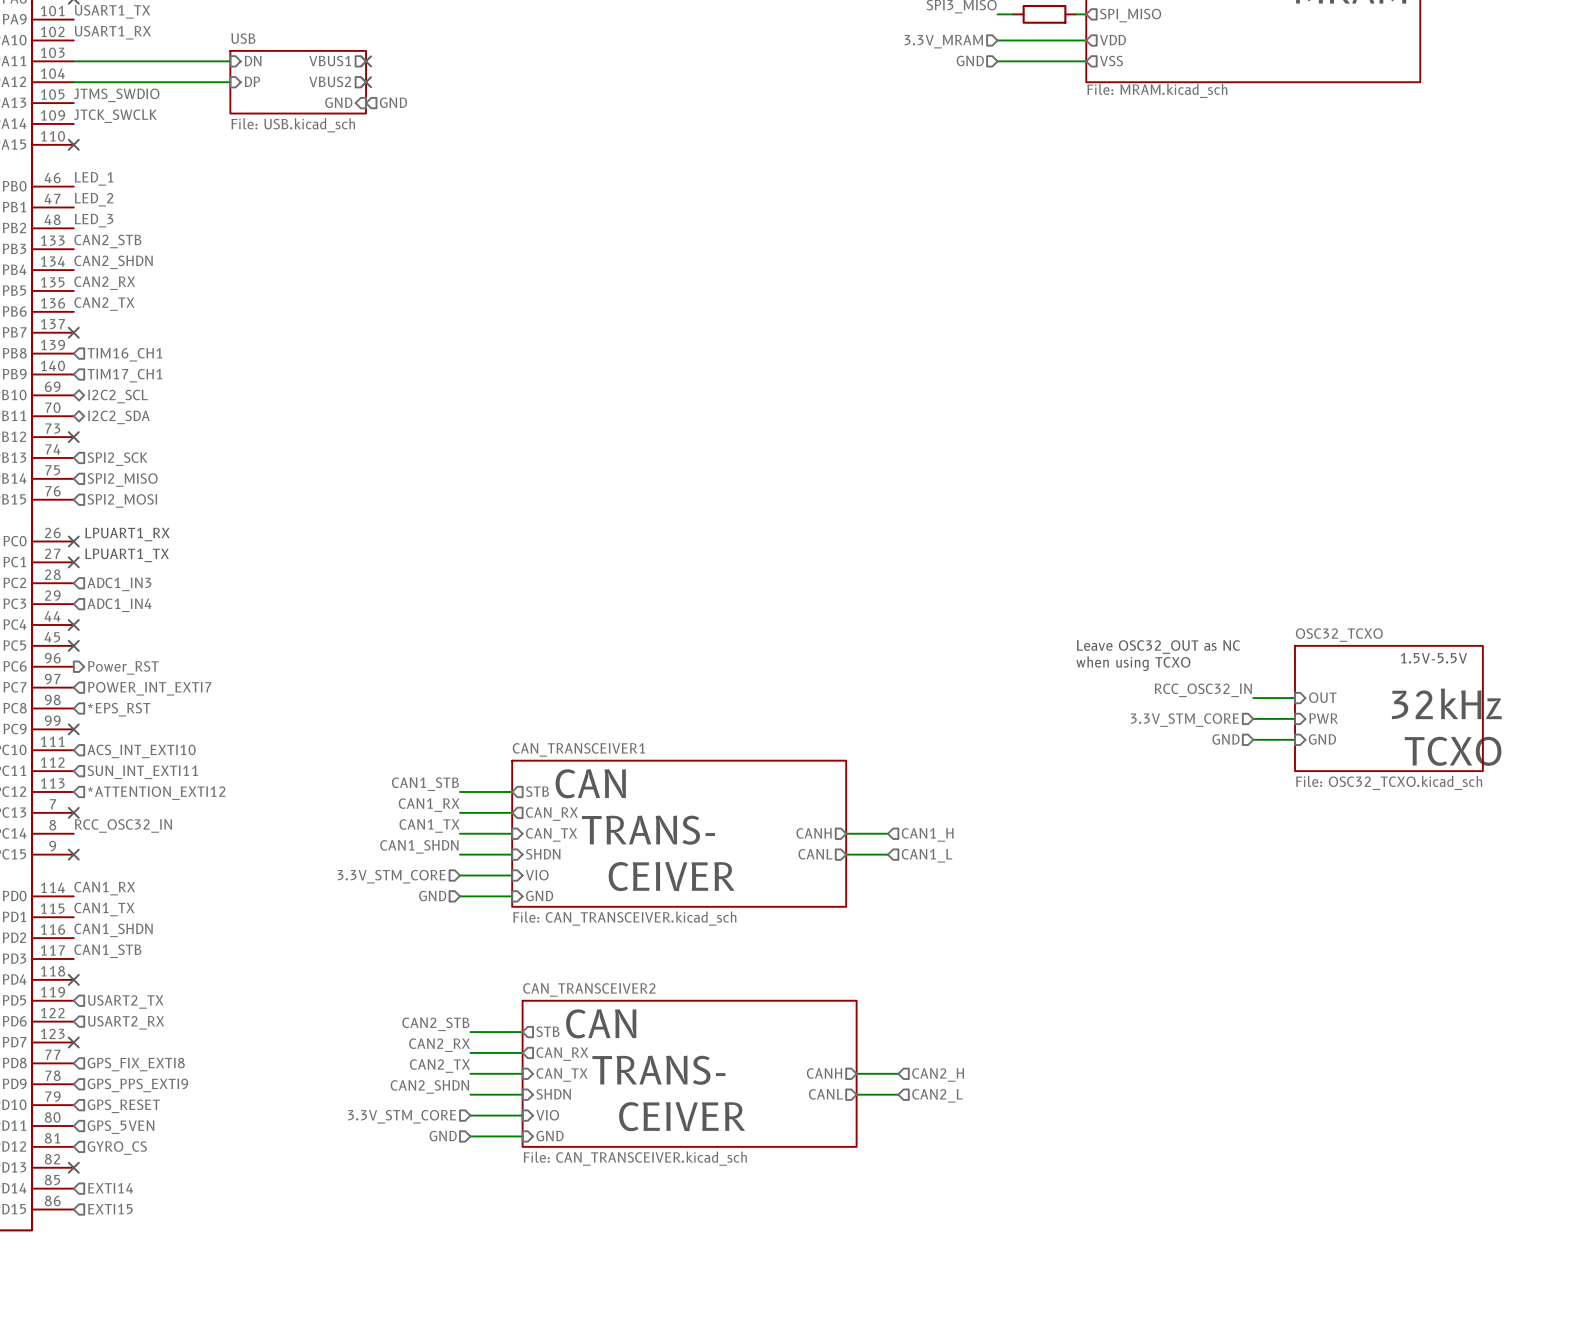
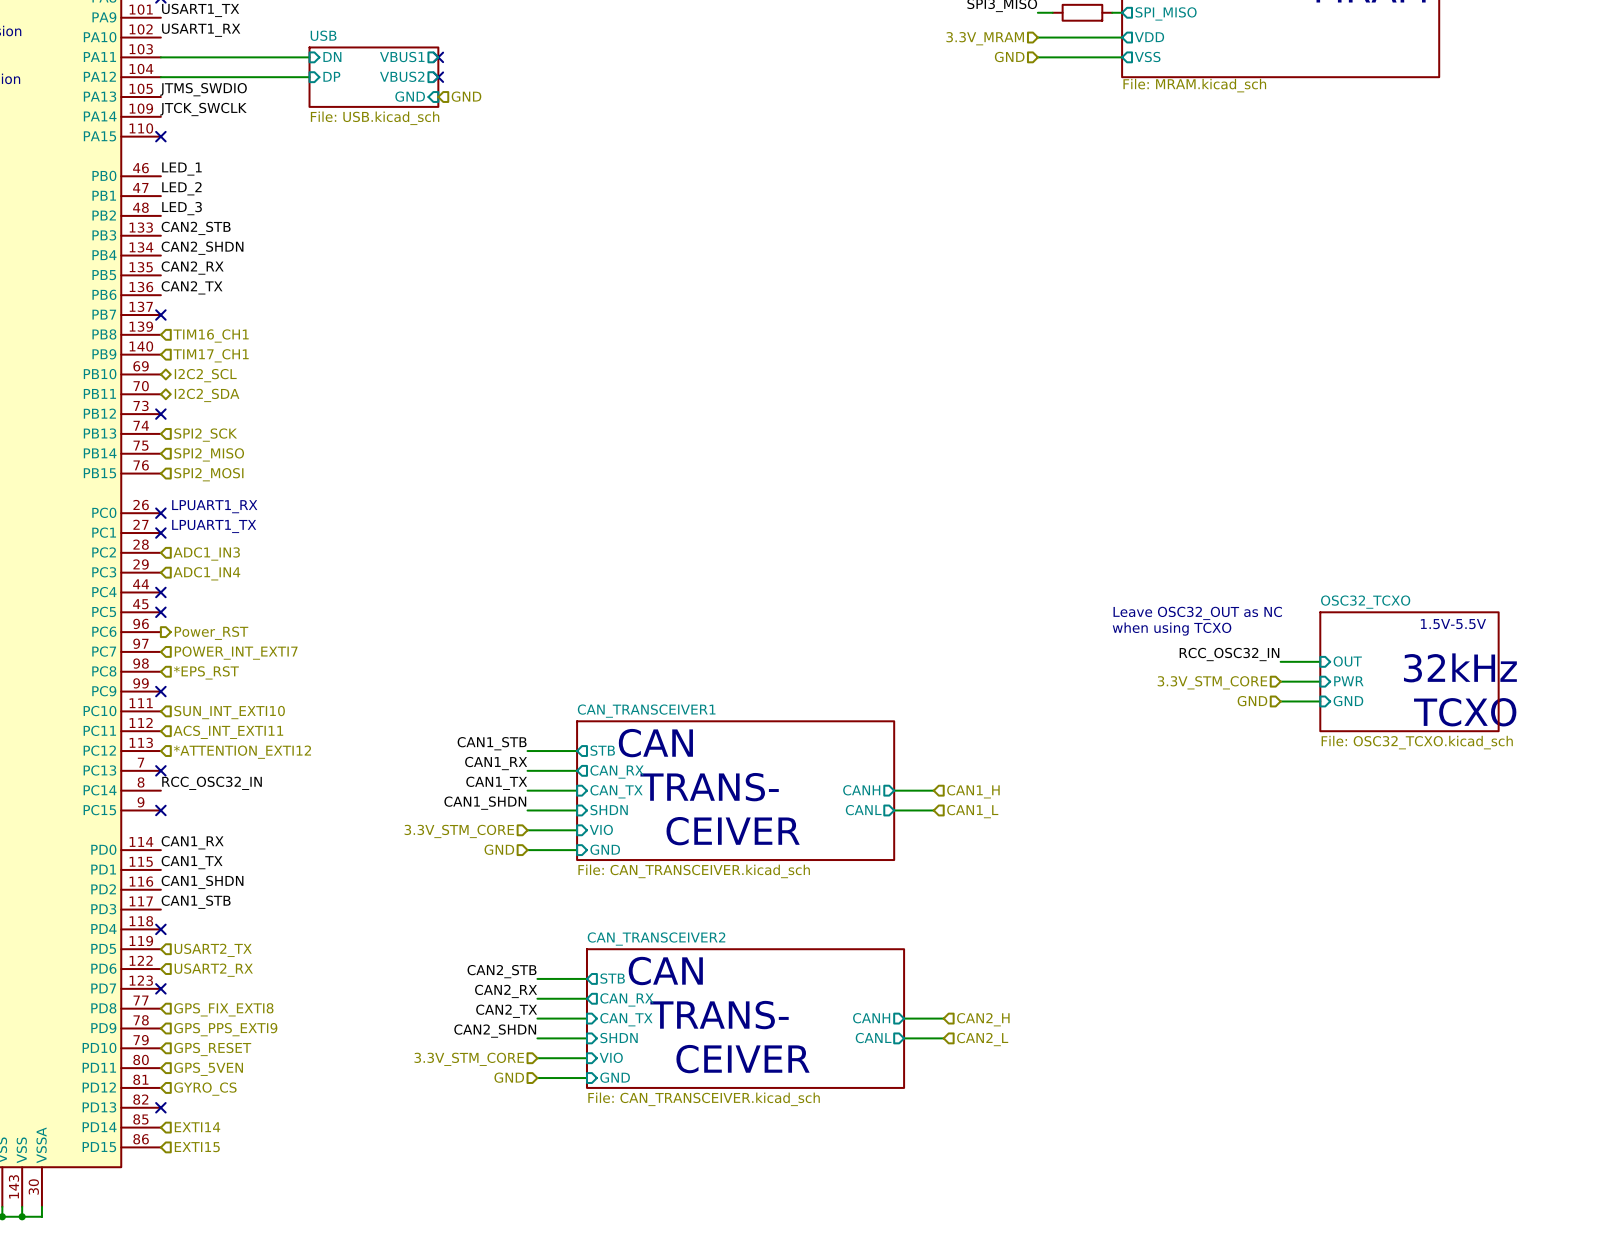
hierarchical label: ACS_INT_EXTI10 (141, 751) -> SUN_INT_EXTI10 (229, 712)
hierarchical label: SUN_INT_EXTI11 (142, 772) -> ACS_INT_EXTI11 (228, 732)

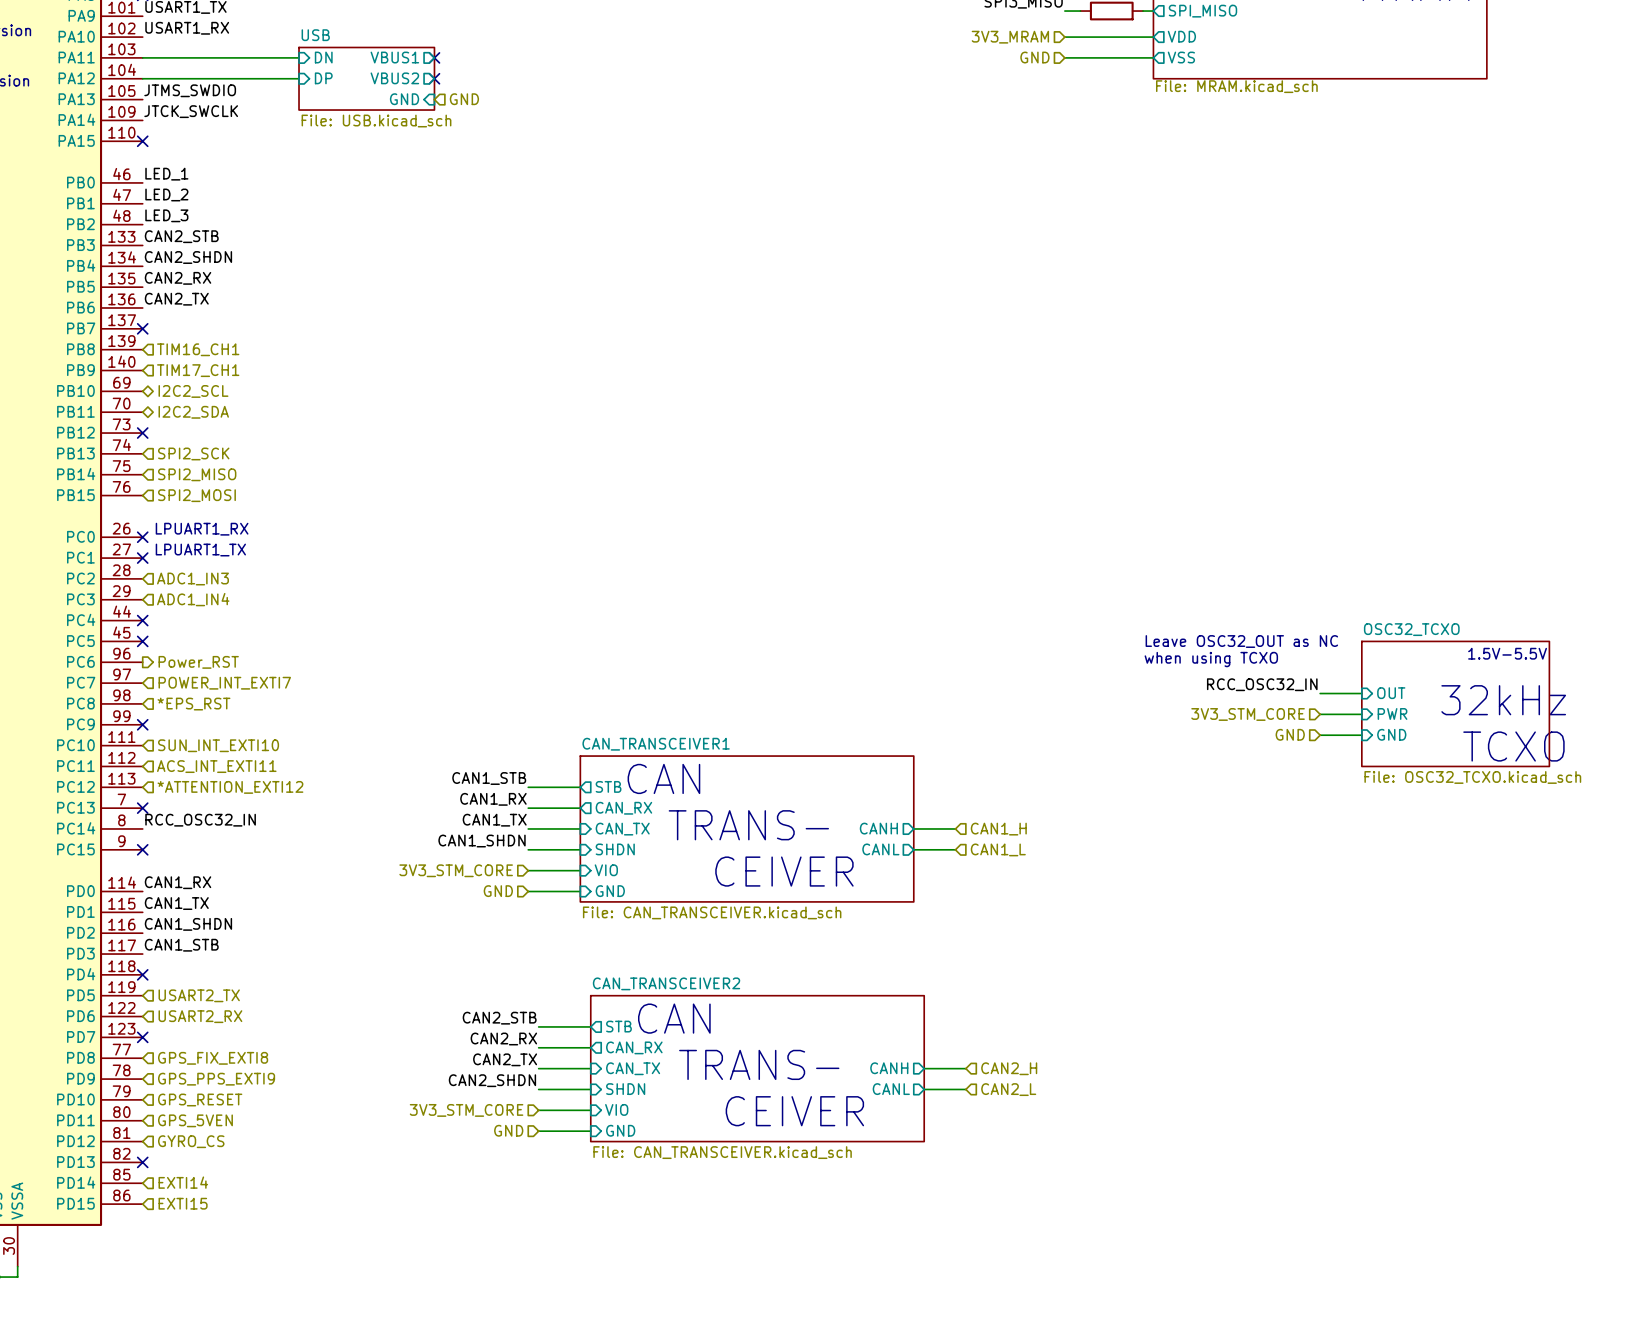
hierarchical label: 3.3V_MRAM (985, 38) -> 3V3_MRAM (1010, 37)
hierarchical label: 3.3V_STM_CORE (1212, 682) -> 3V3_STM_CORE (1248, 714)
hierarchical label: 3.3V_STM_CORE (459, 831) -> 3V3_STM_CORE (456, 870)
hierarchical label: 3.3V_STM_CORE (469, 1059) -> 3V3_STM_CORE (466, 1110)

